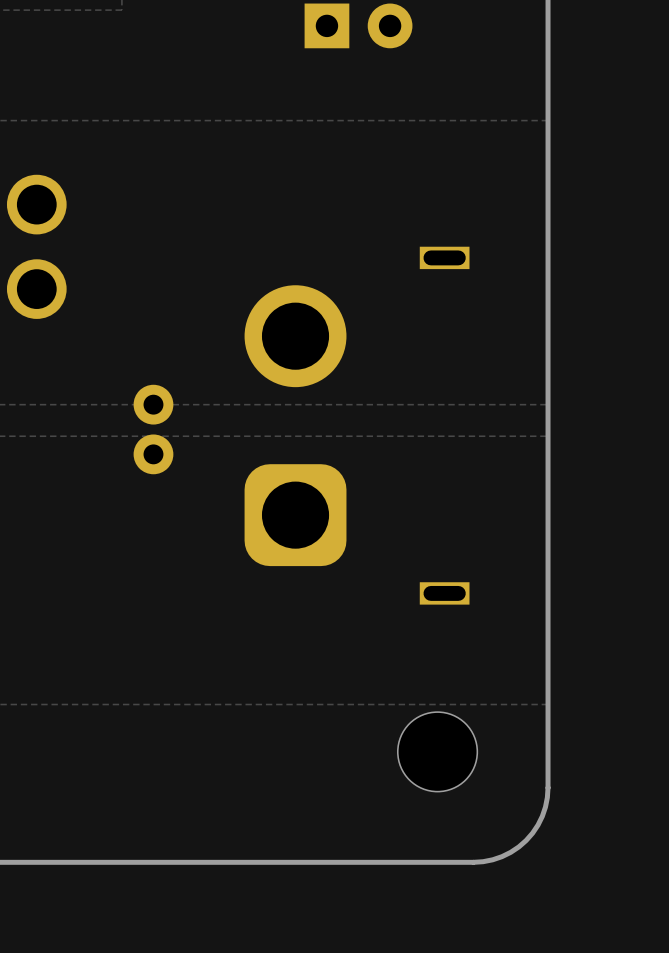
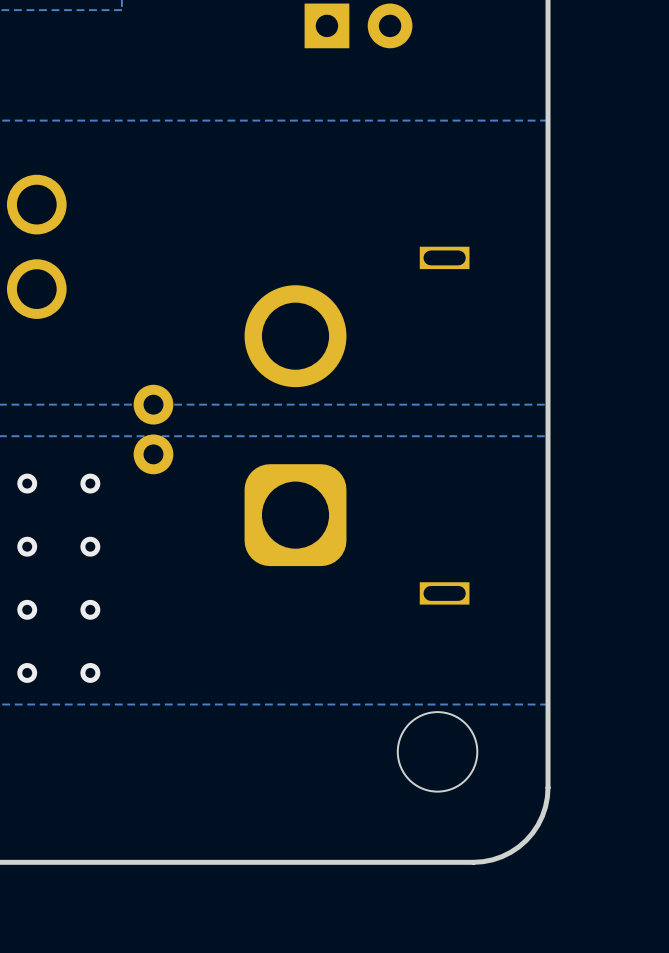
via: none -> (27, 483)
via: none -> (90, 483)
via: none -> (27, 546)
via: none -> (90, 546)
via: none -> (27, 609)
via: none -> (90, 609)
via: none -> (27, 672)
via: none -> (90, 672)

